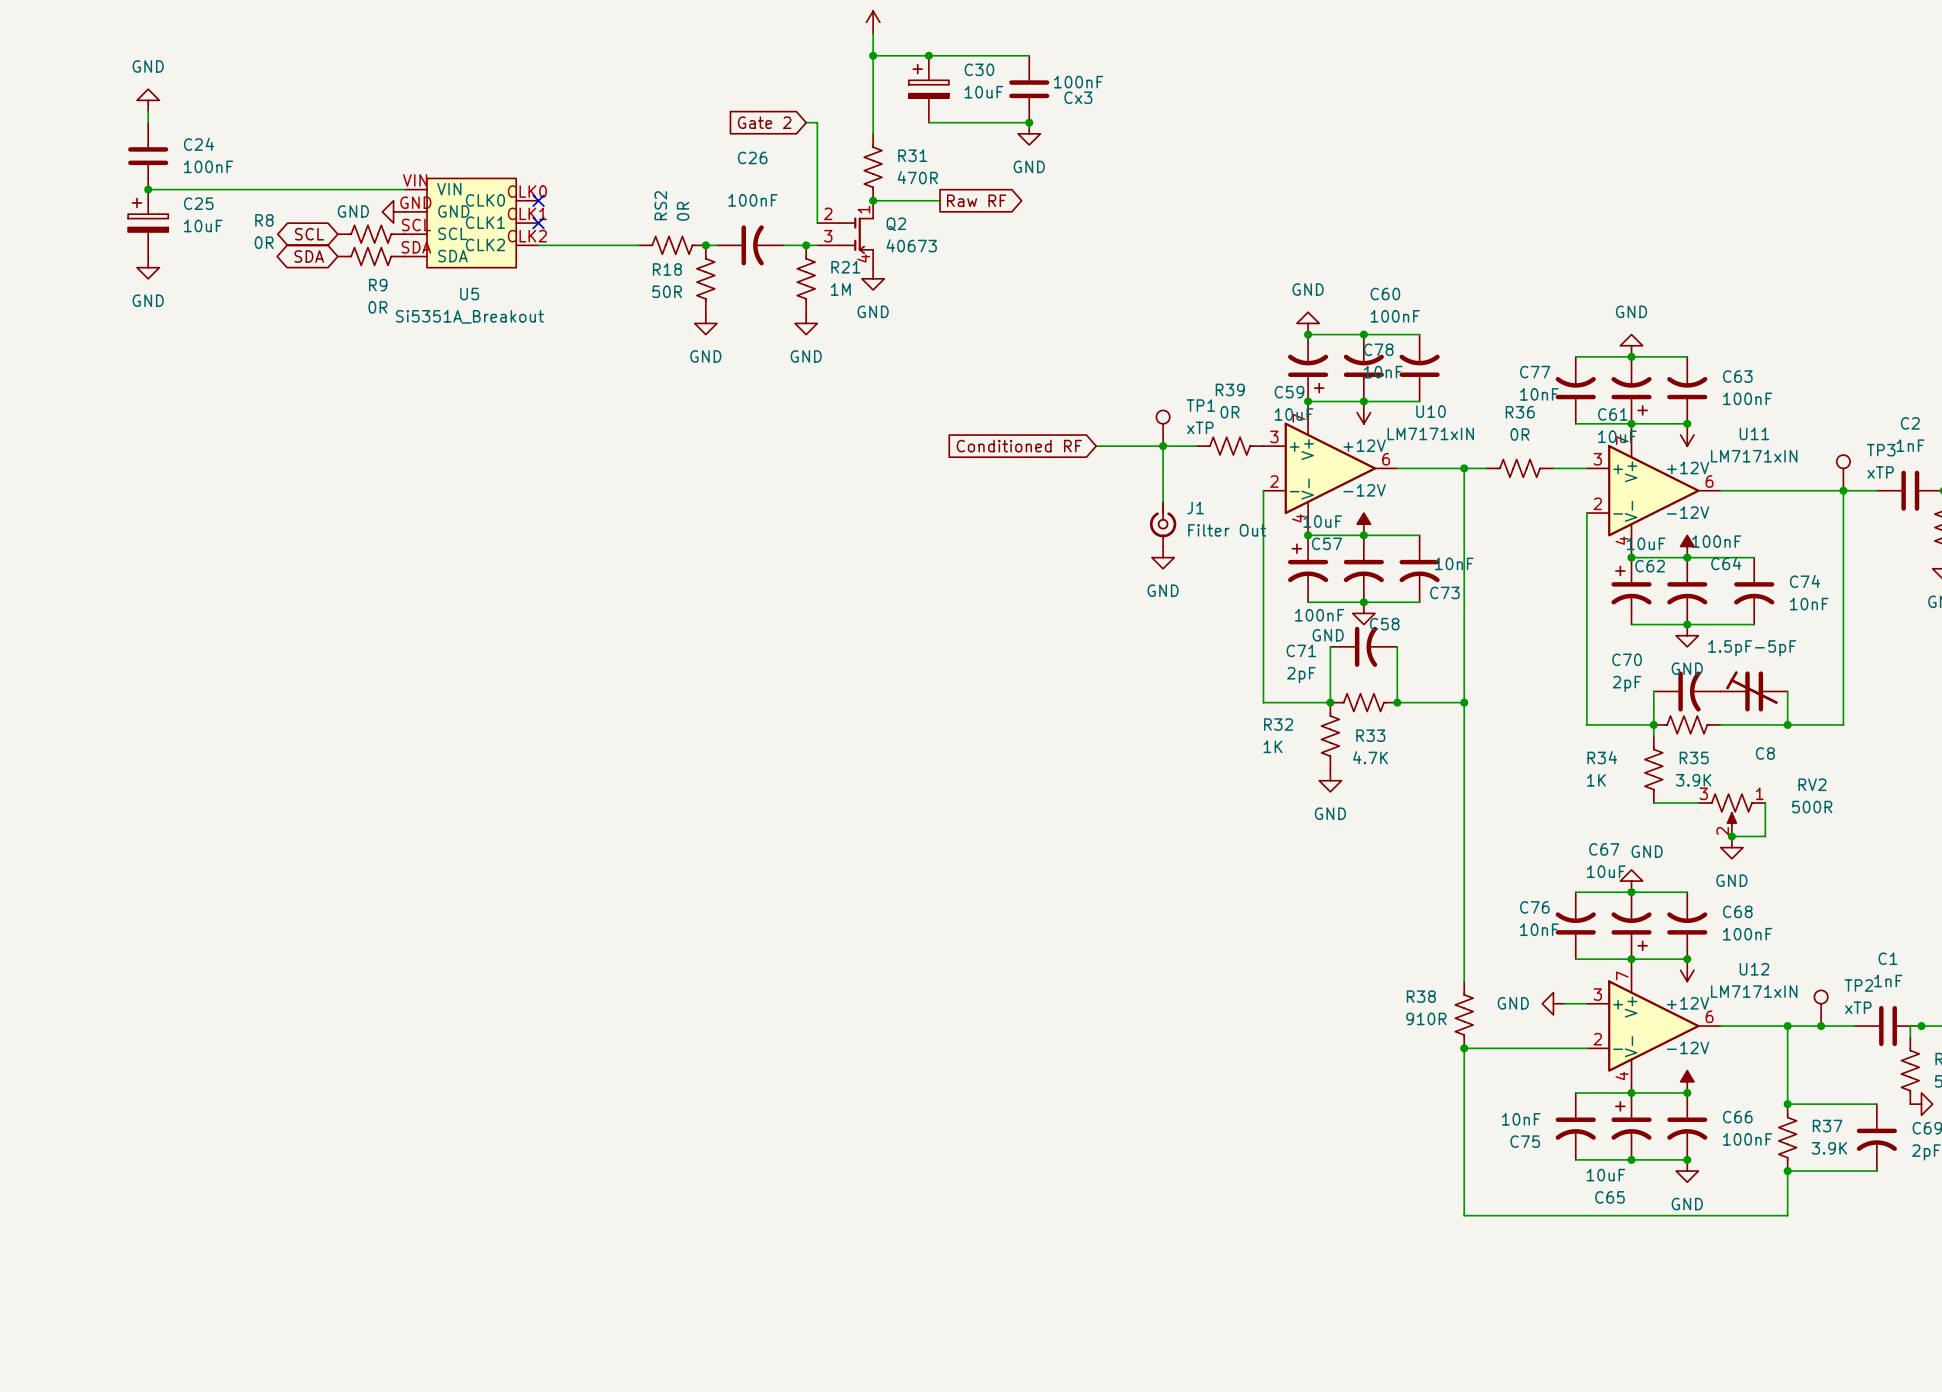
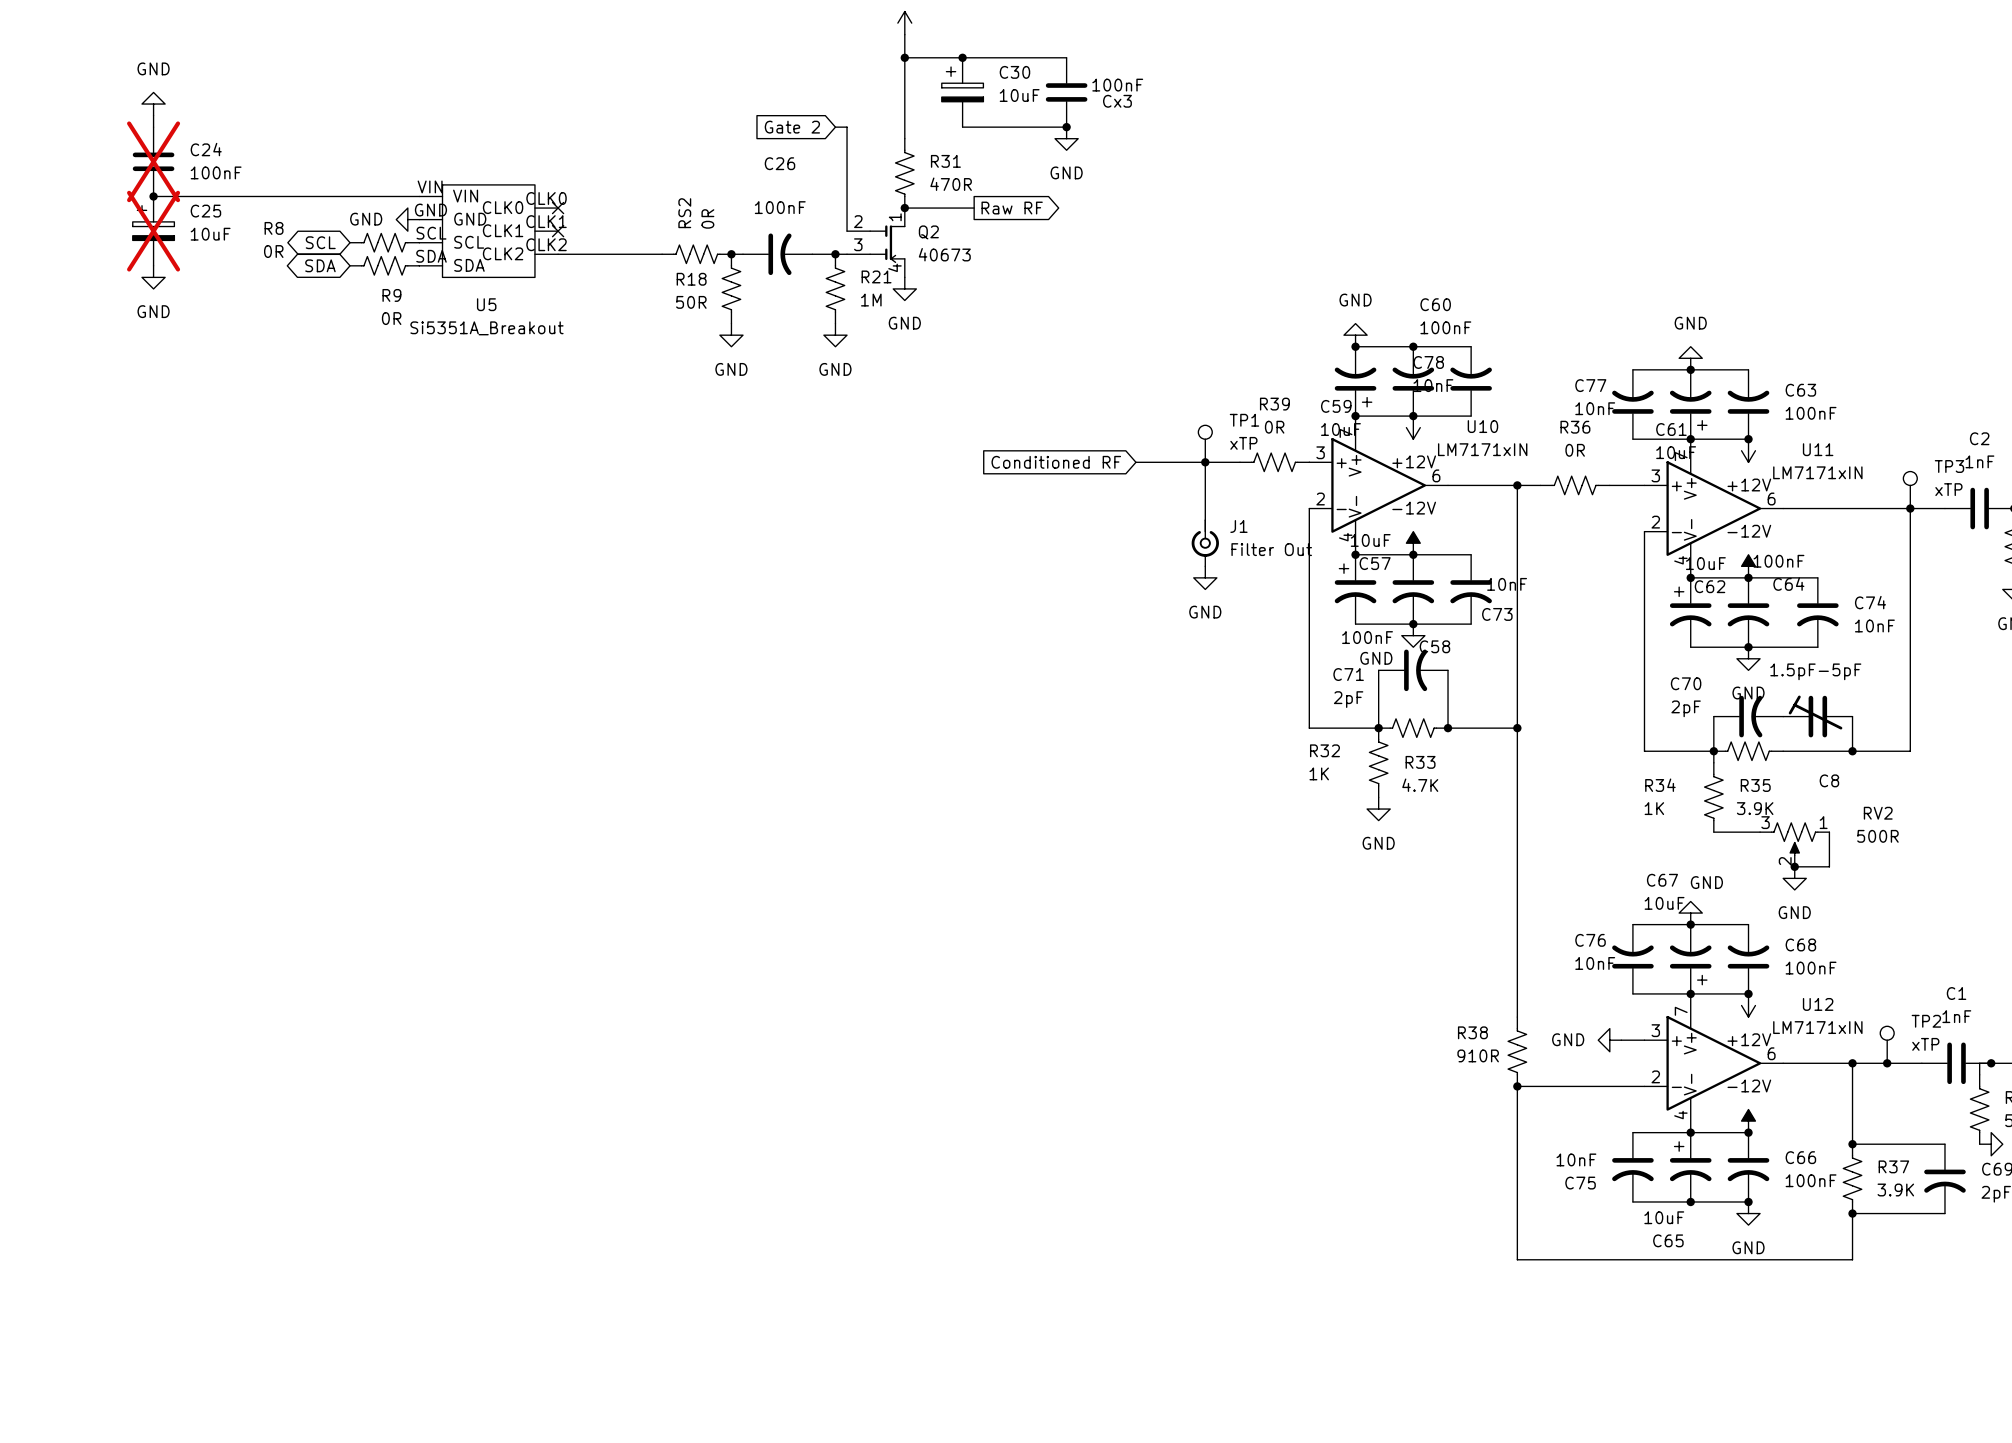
C24 do-not-place cross: none -> (153, 161)
C25 do-not-place cross: none -> (153, 231)

